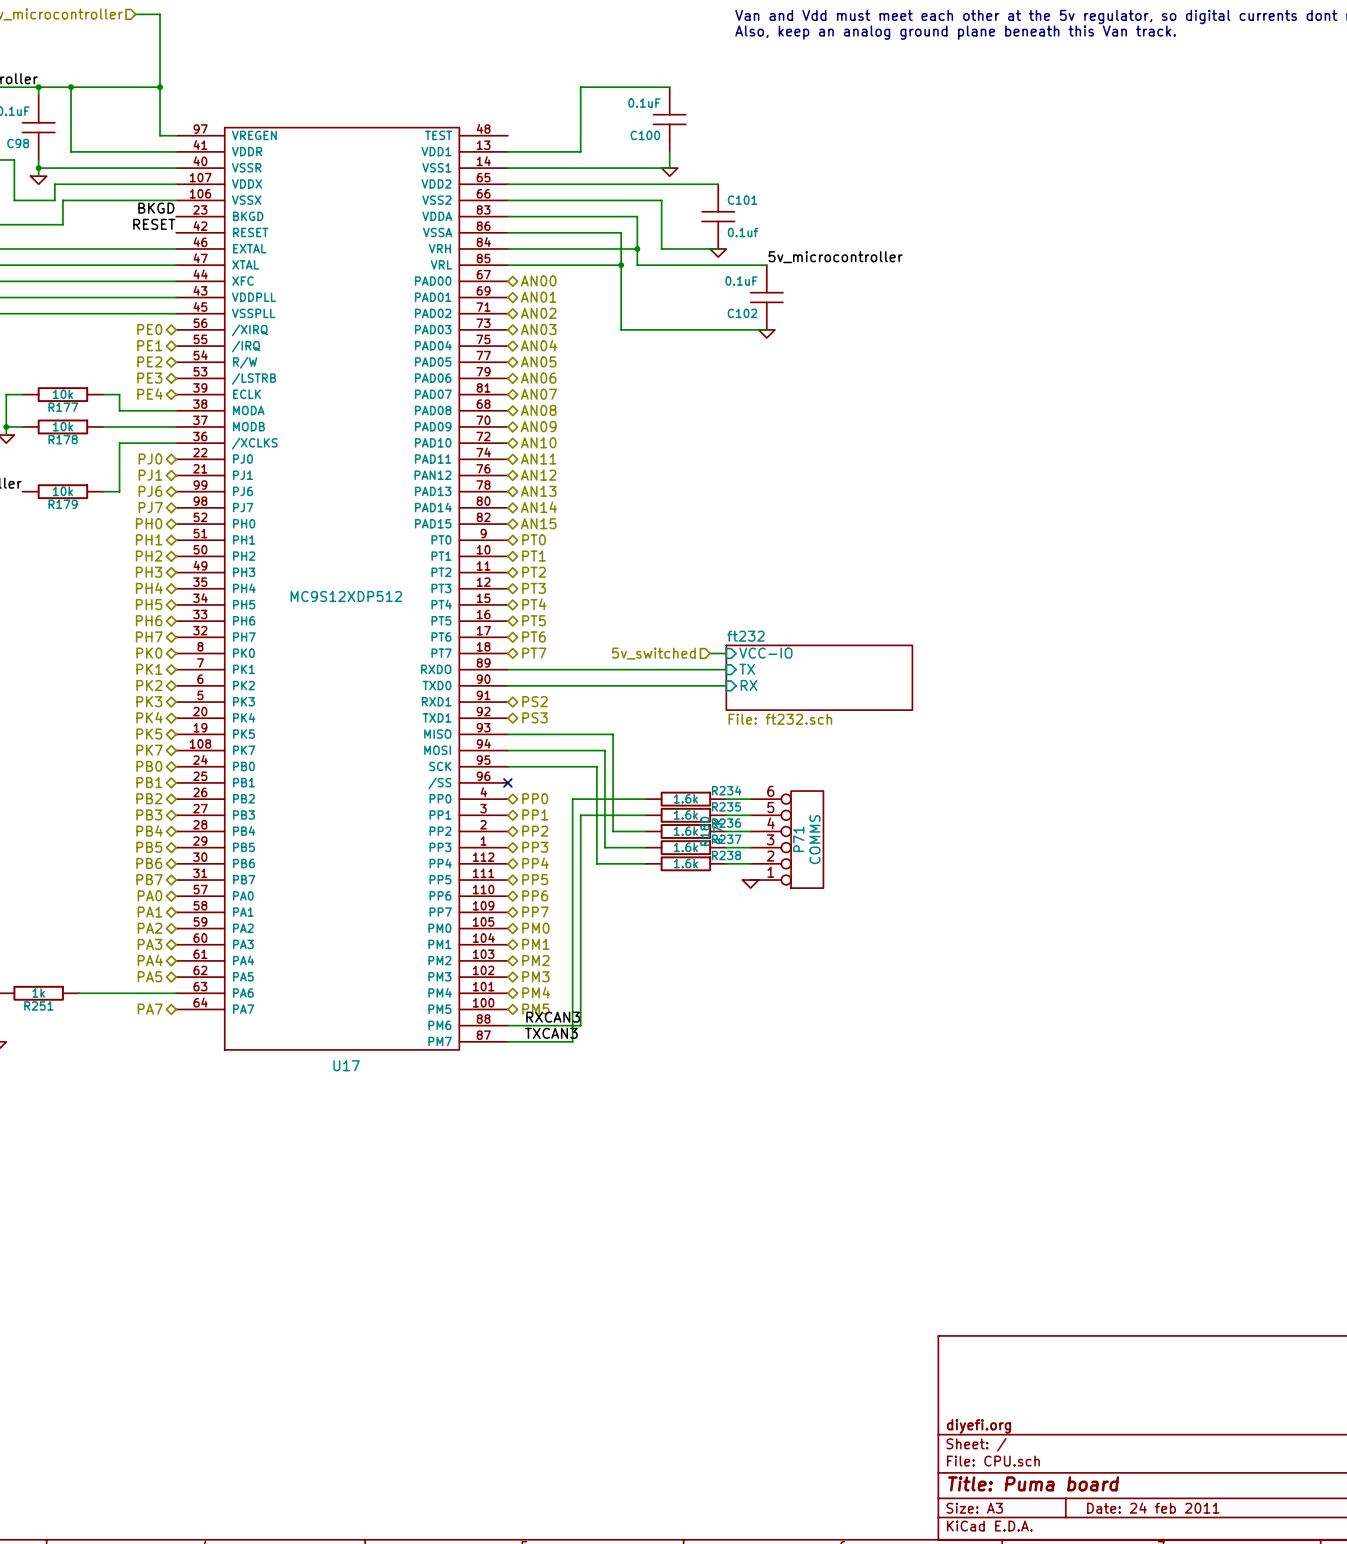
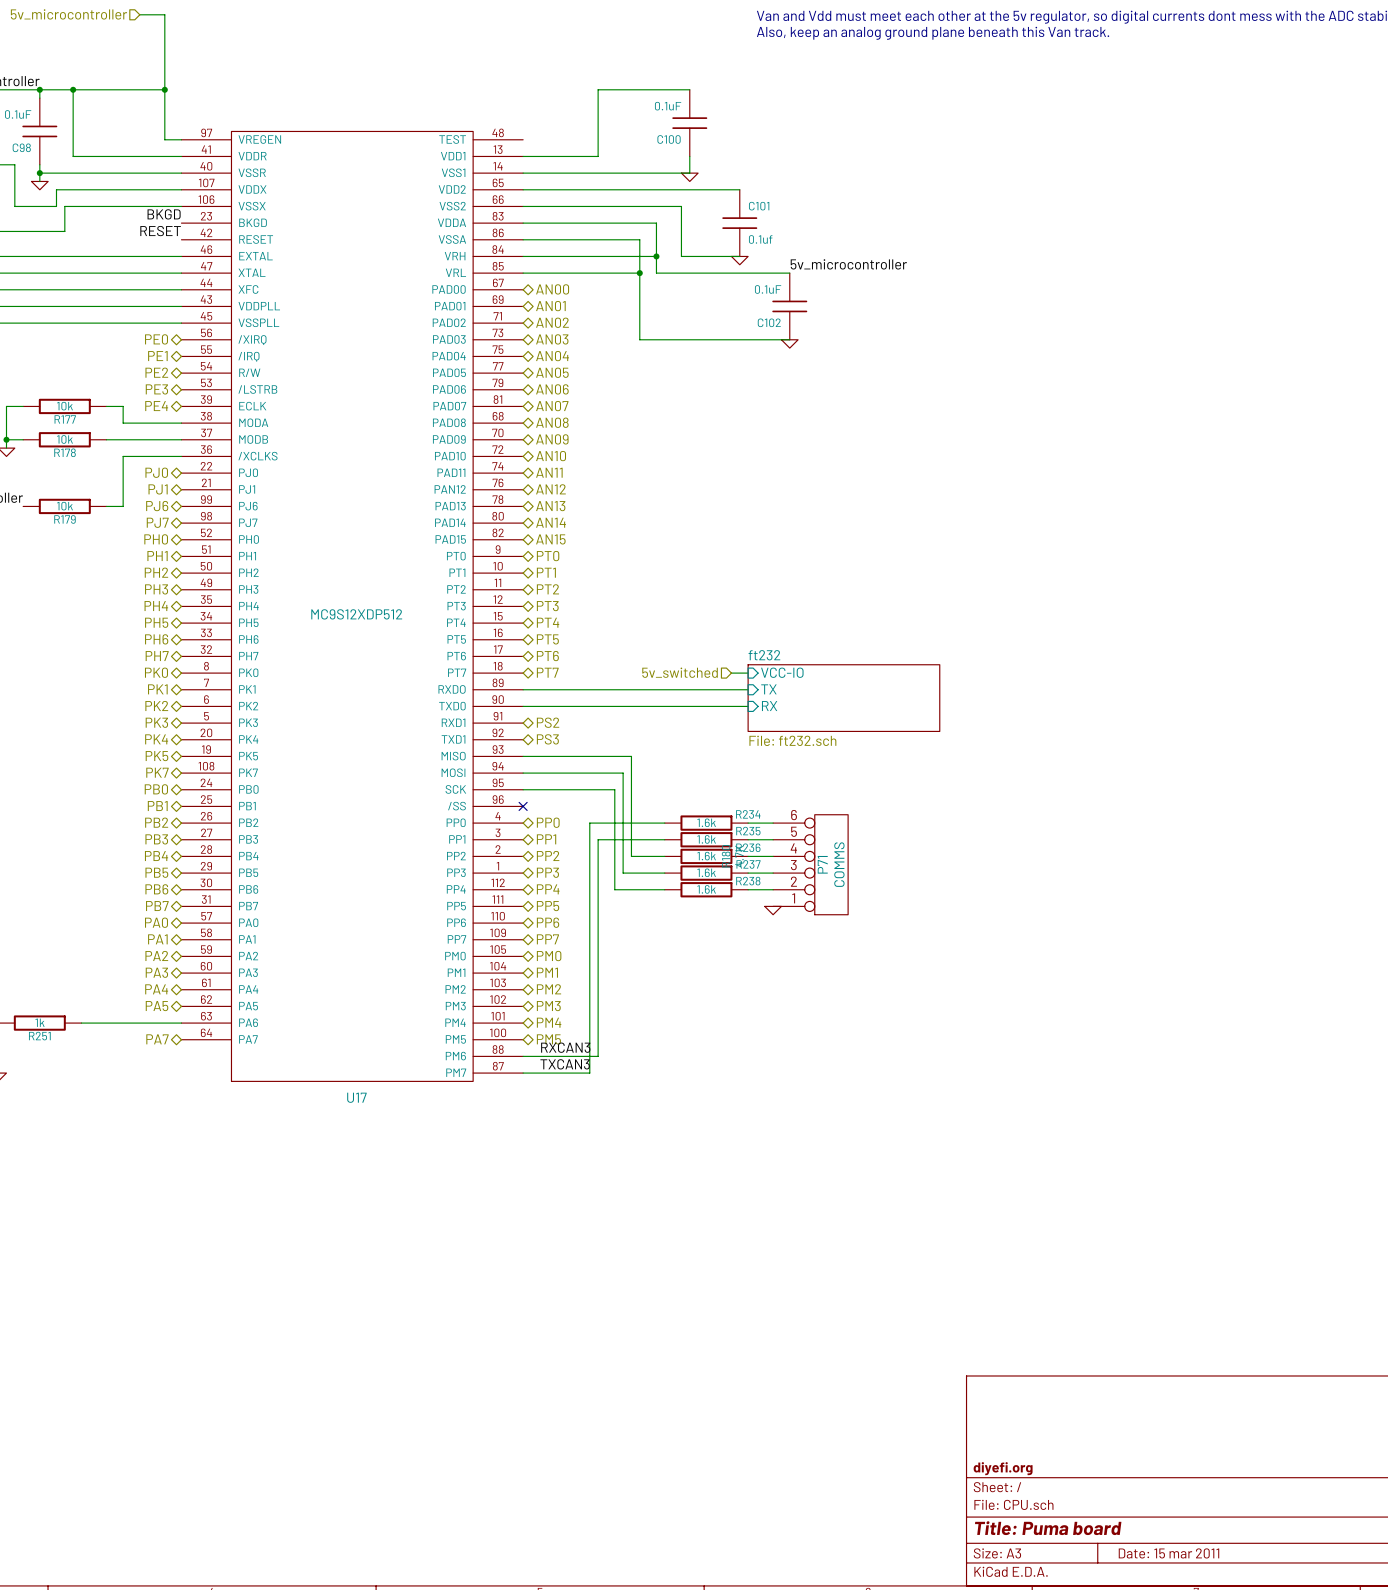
title block: Date: 24 feb 2011 (1153, 1507) -> Date: 15 mar 2011 (1168, 1553)

